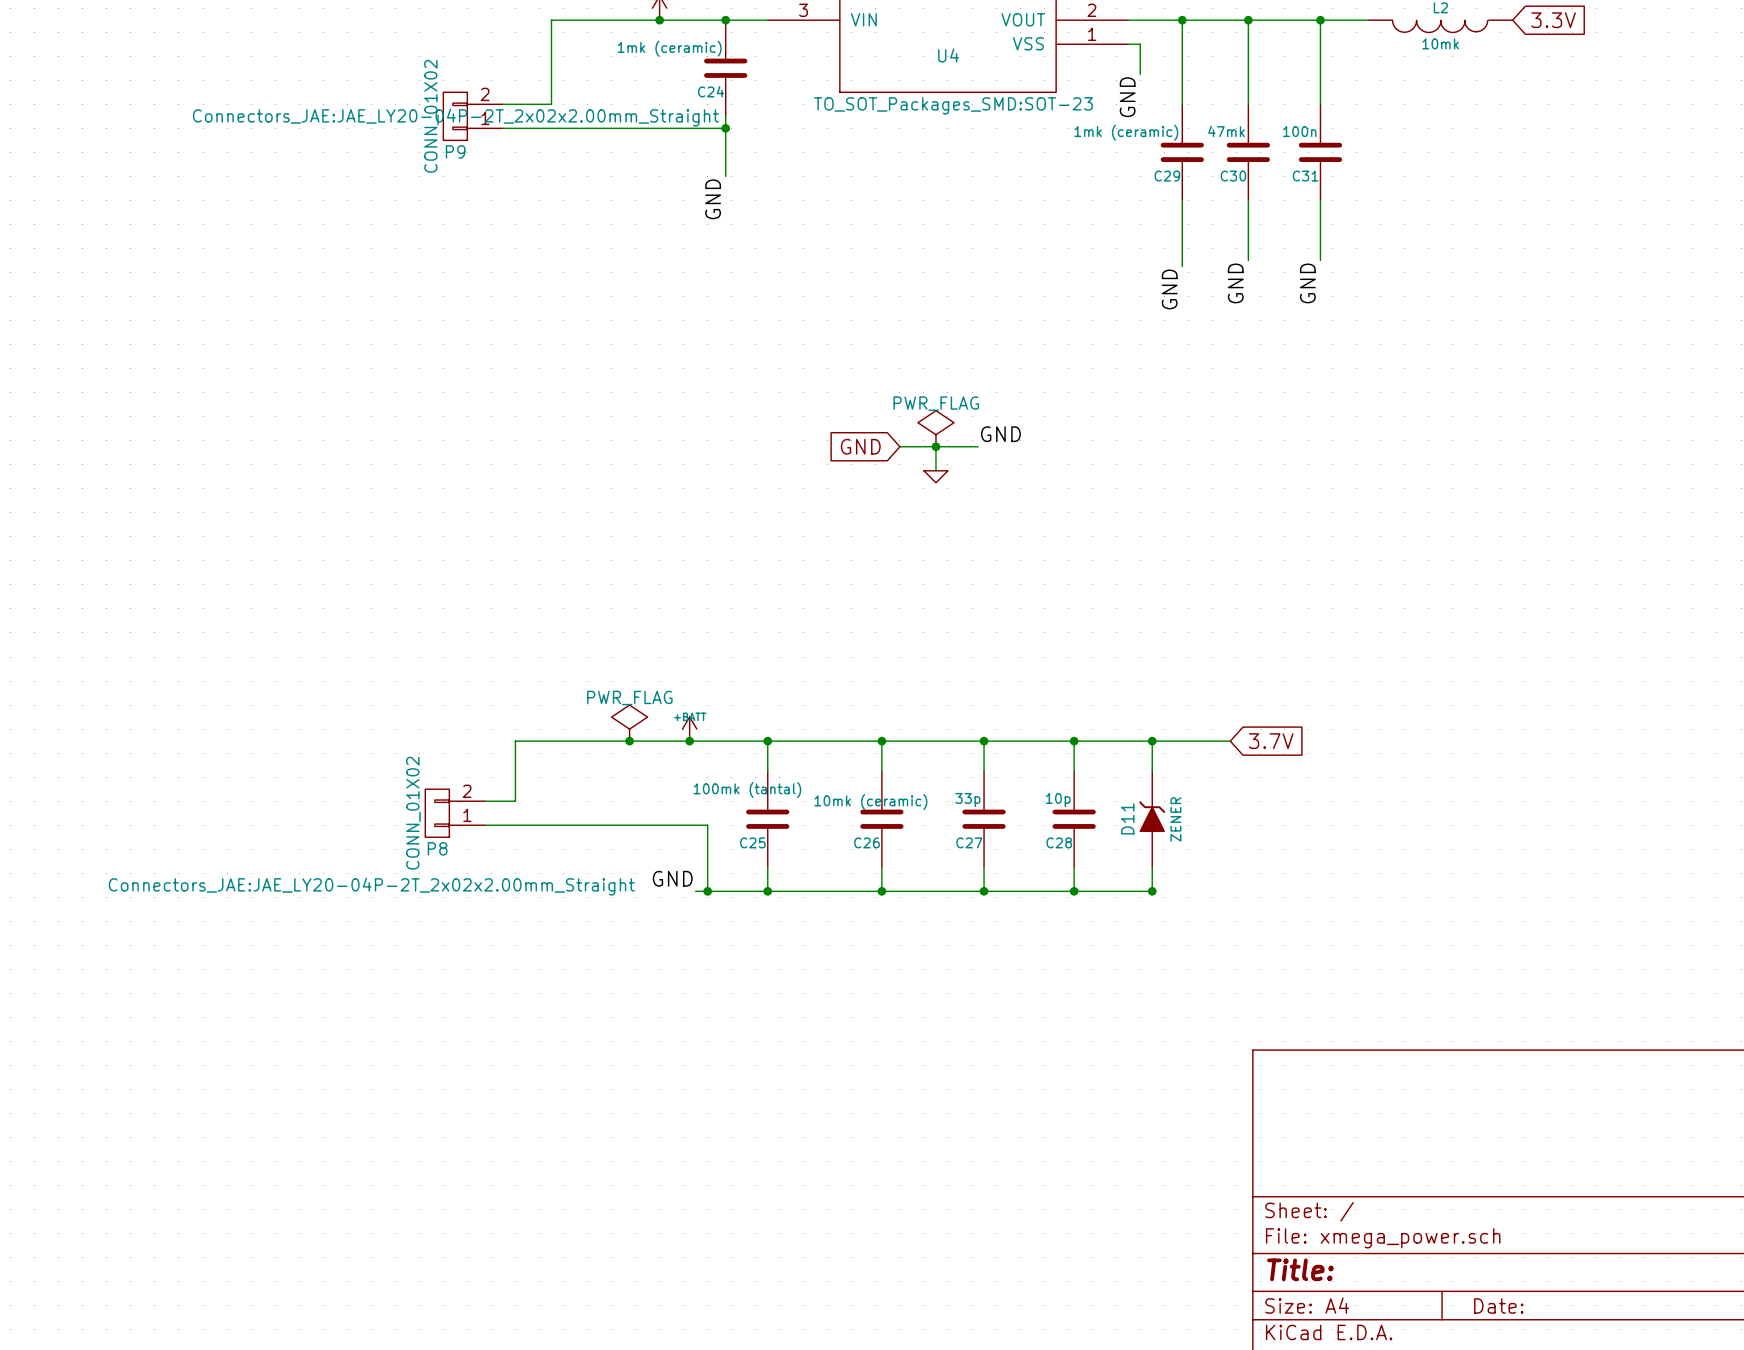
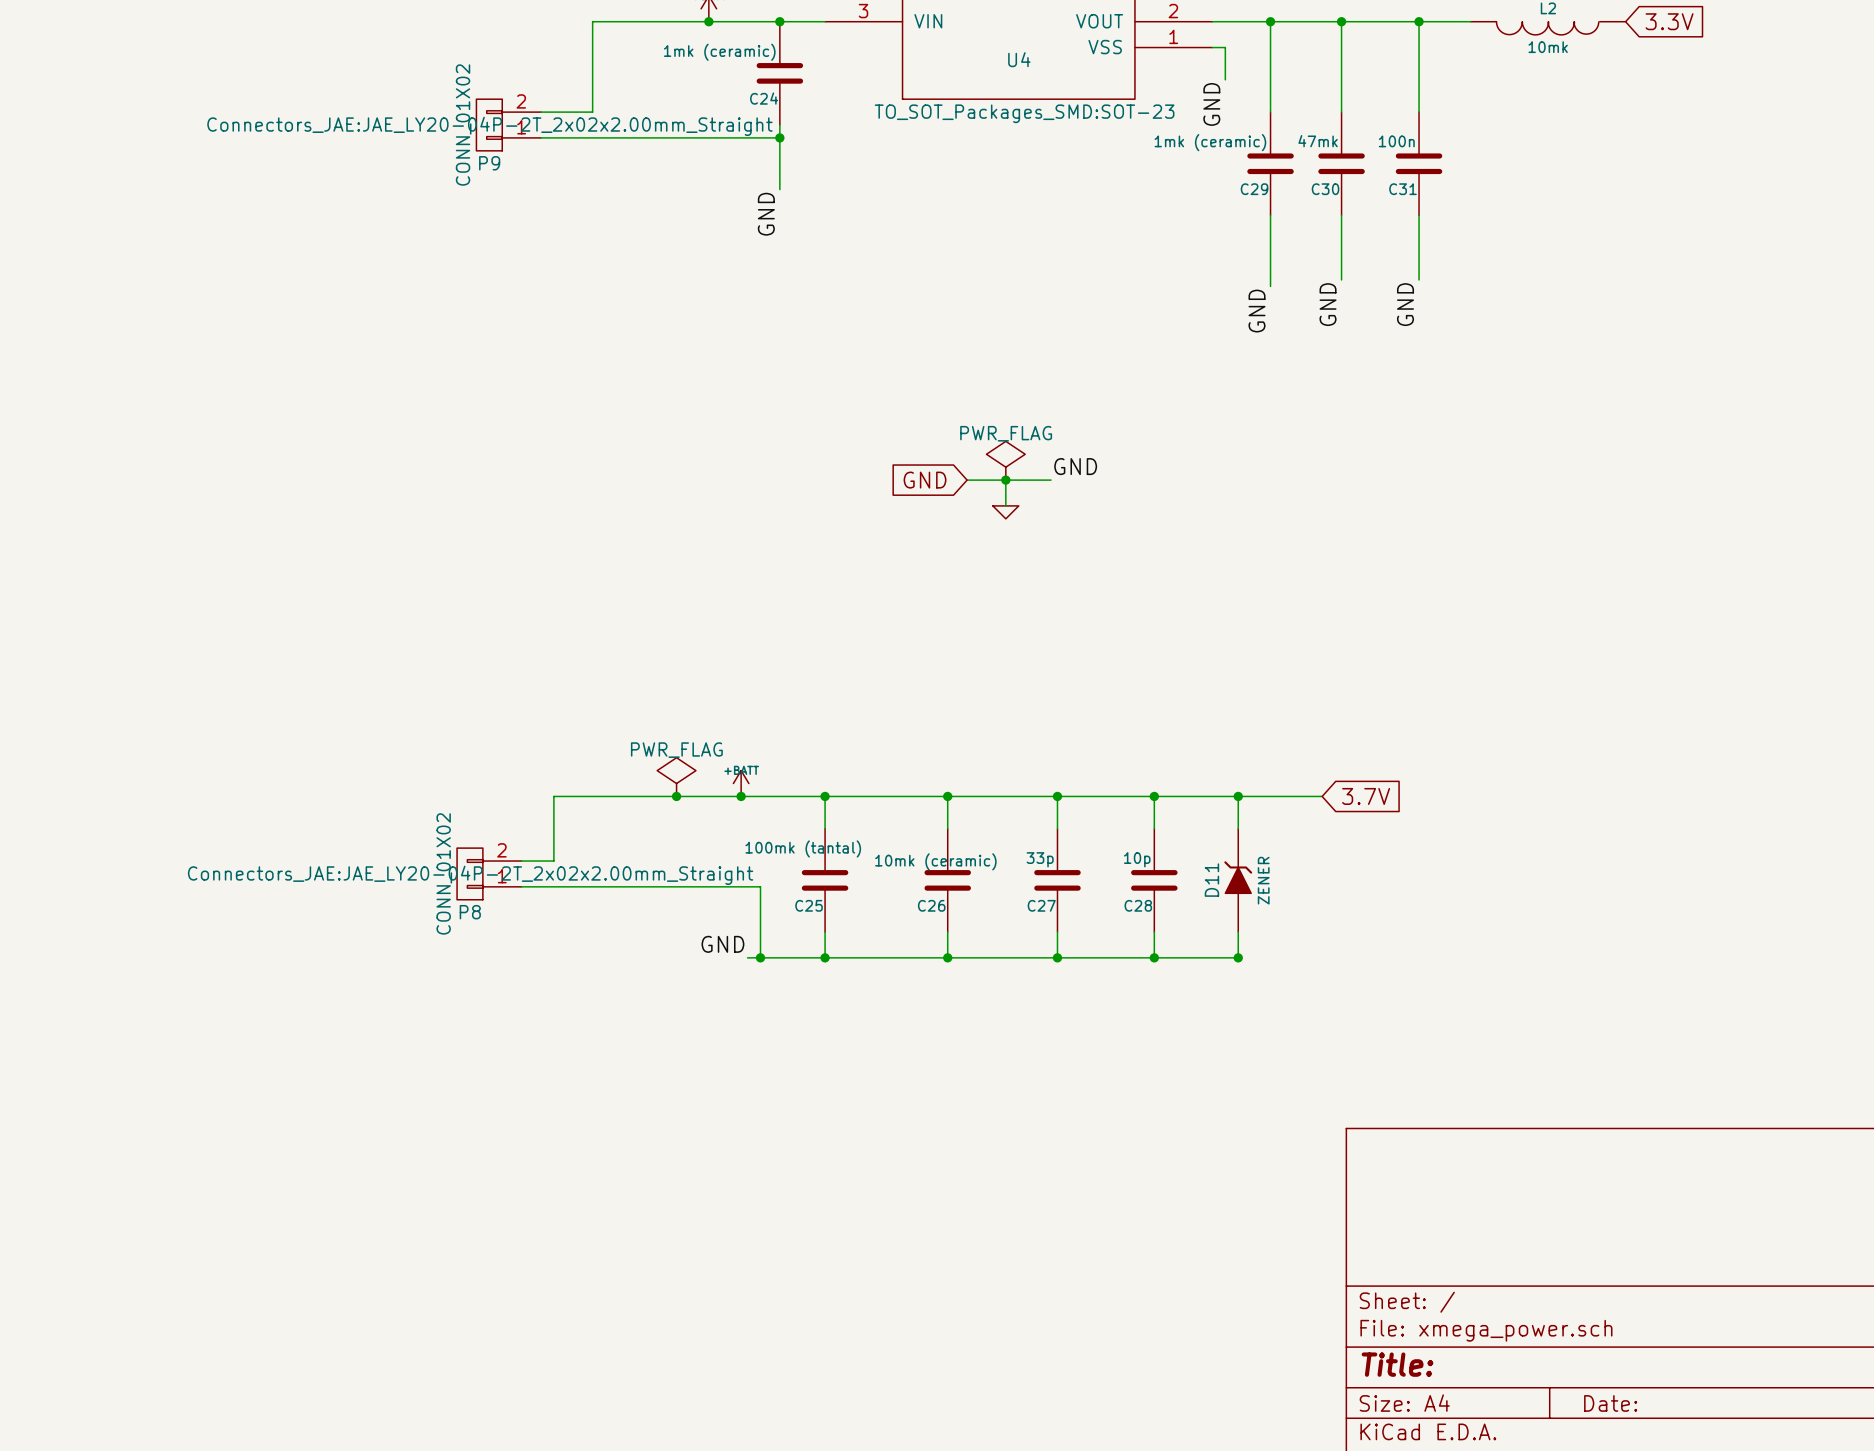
P8 text position: Connectors_JAE:JAE_LY20-04P-2T_2x02x2.00mm_Straight (371, 886) -> Connectors_JAE:JAE_LY20-04P-2T_2x02x2.00mm_Straight (470, 875)

